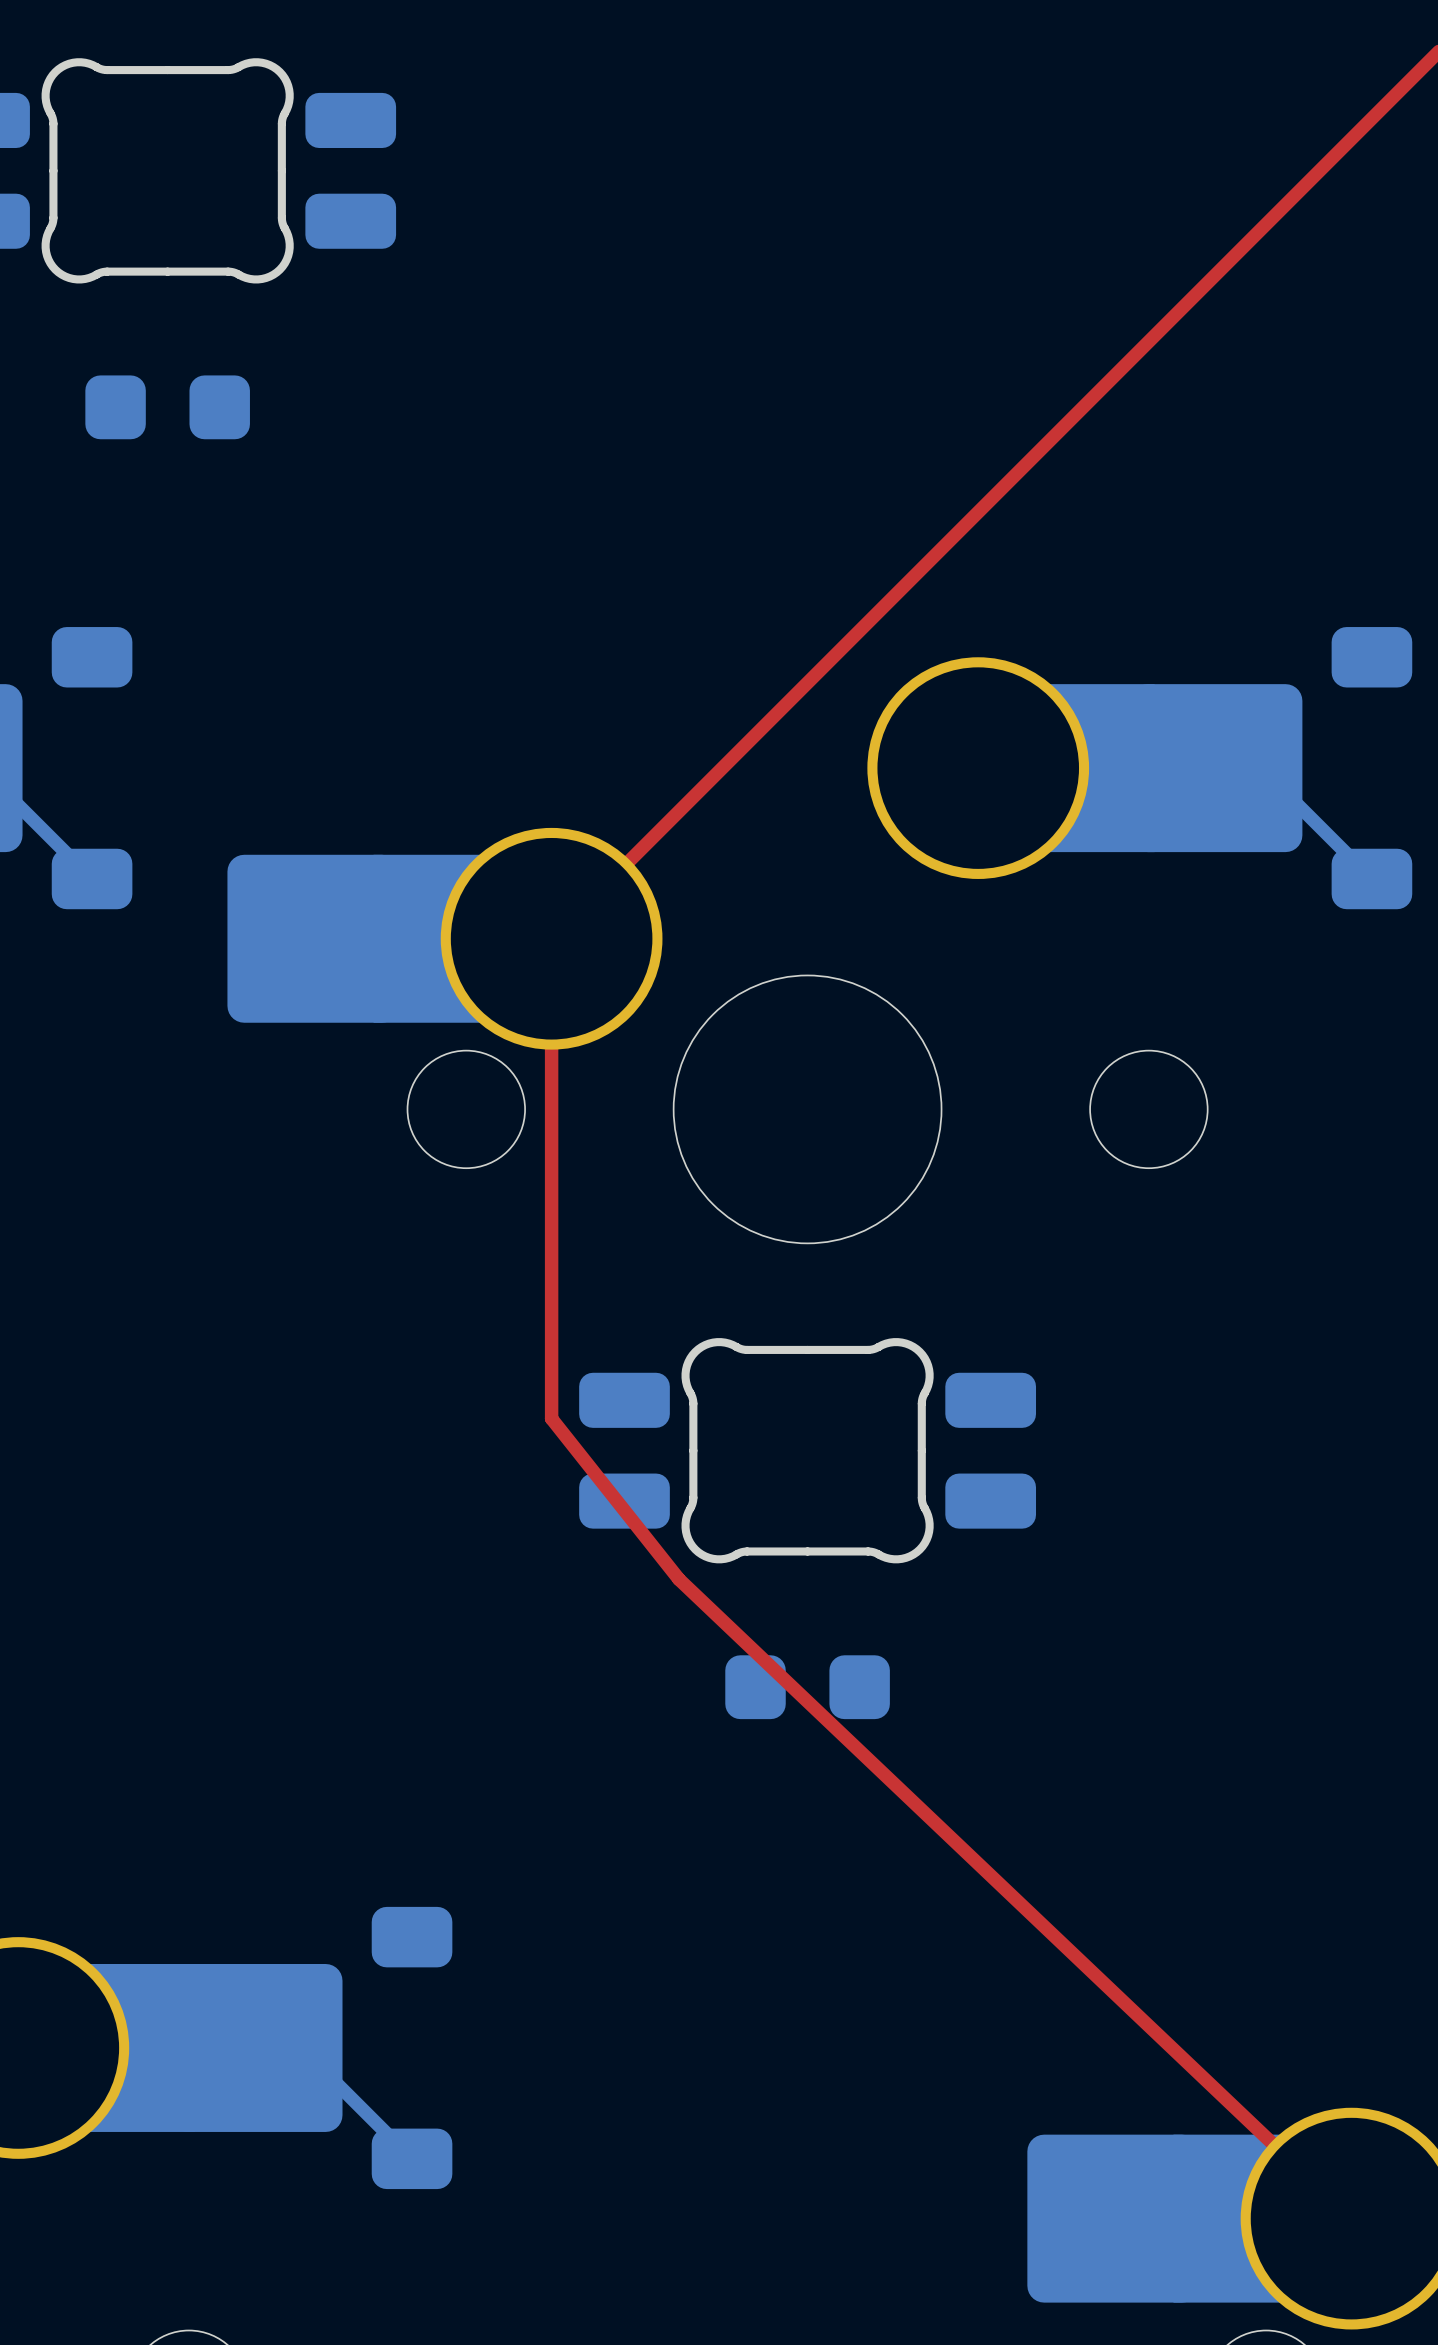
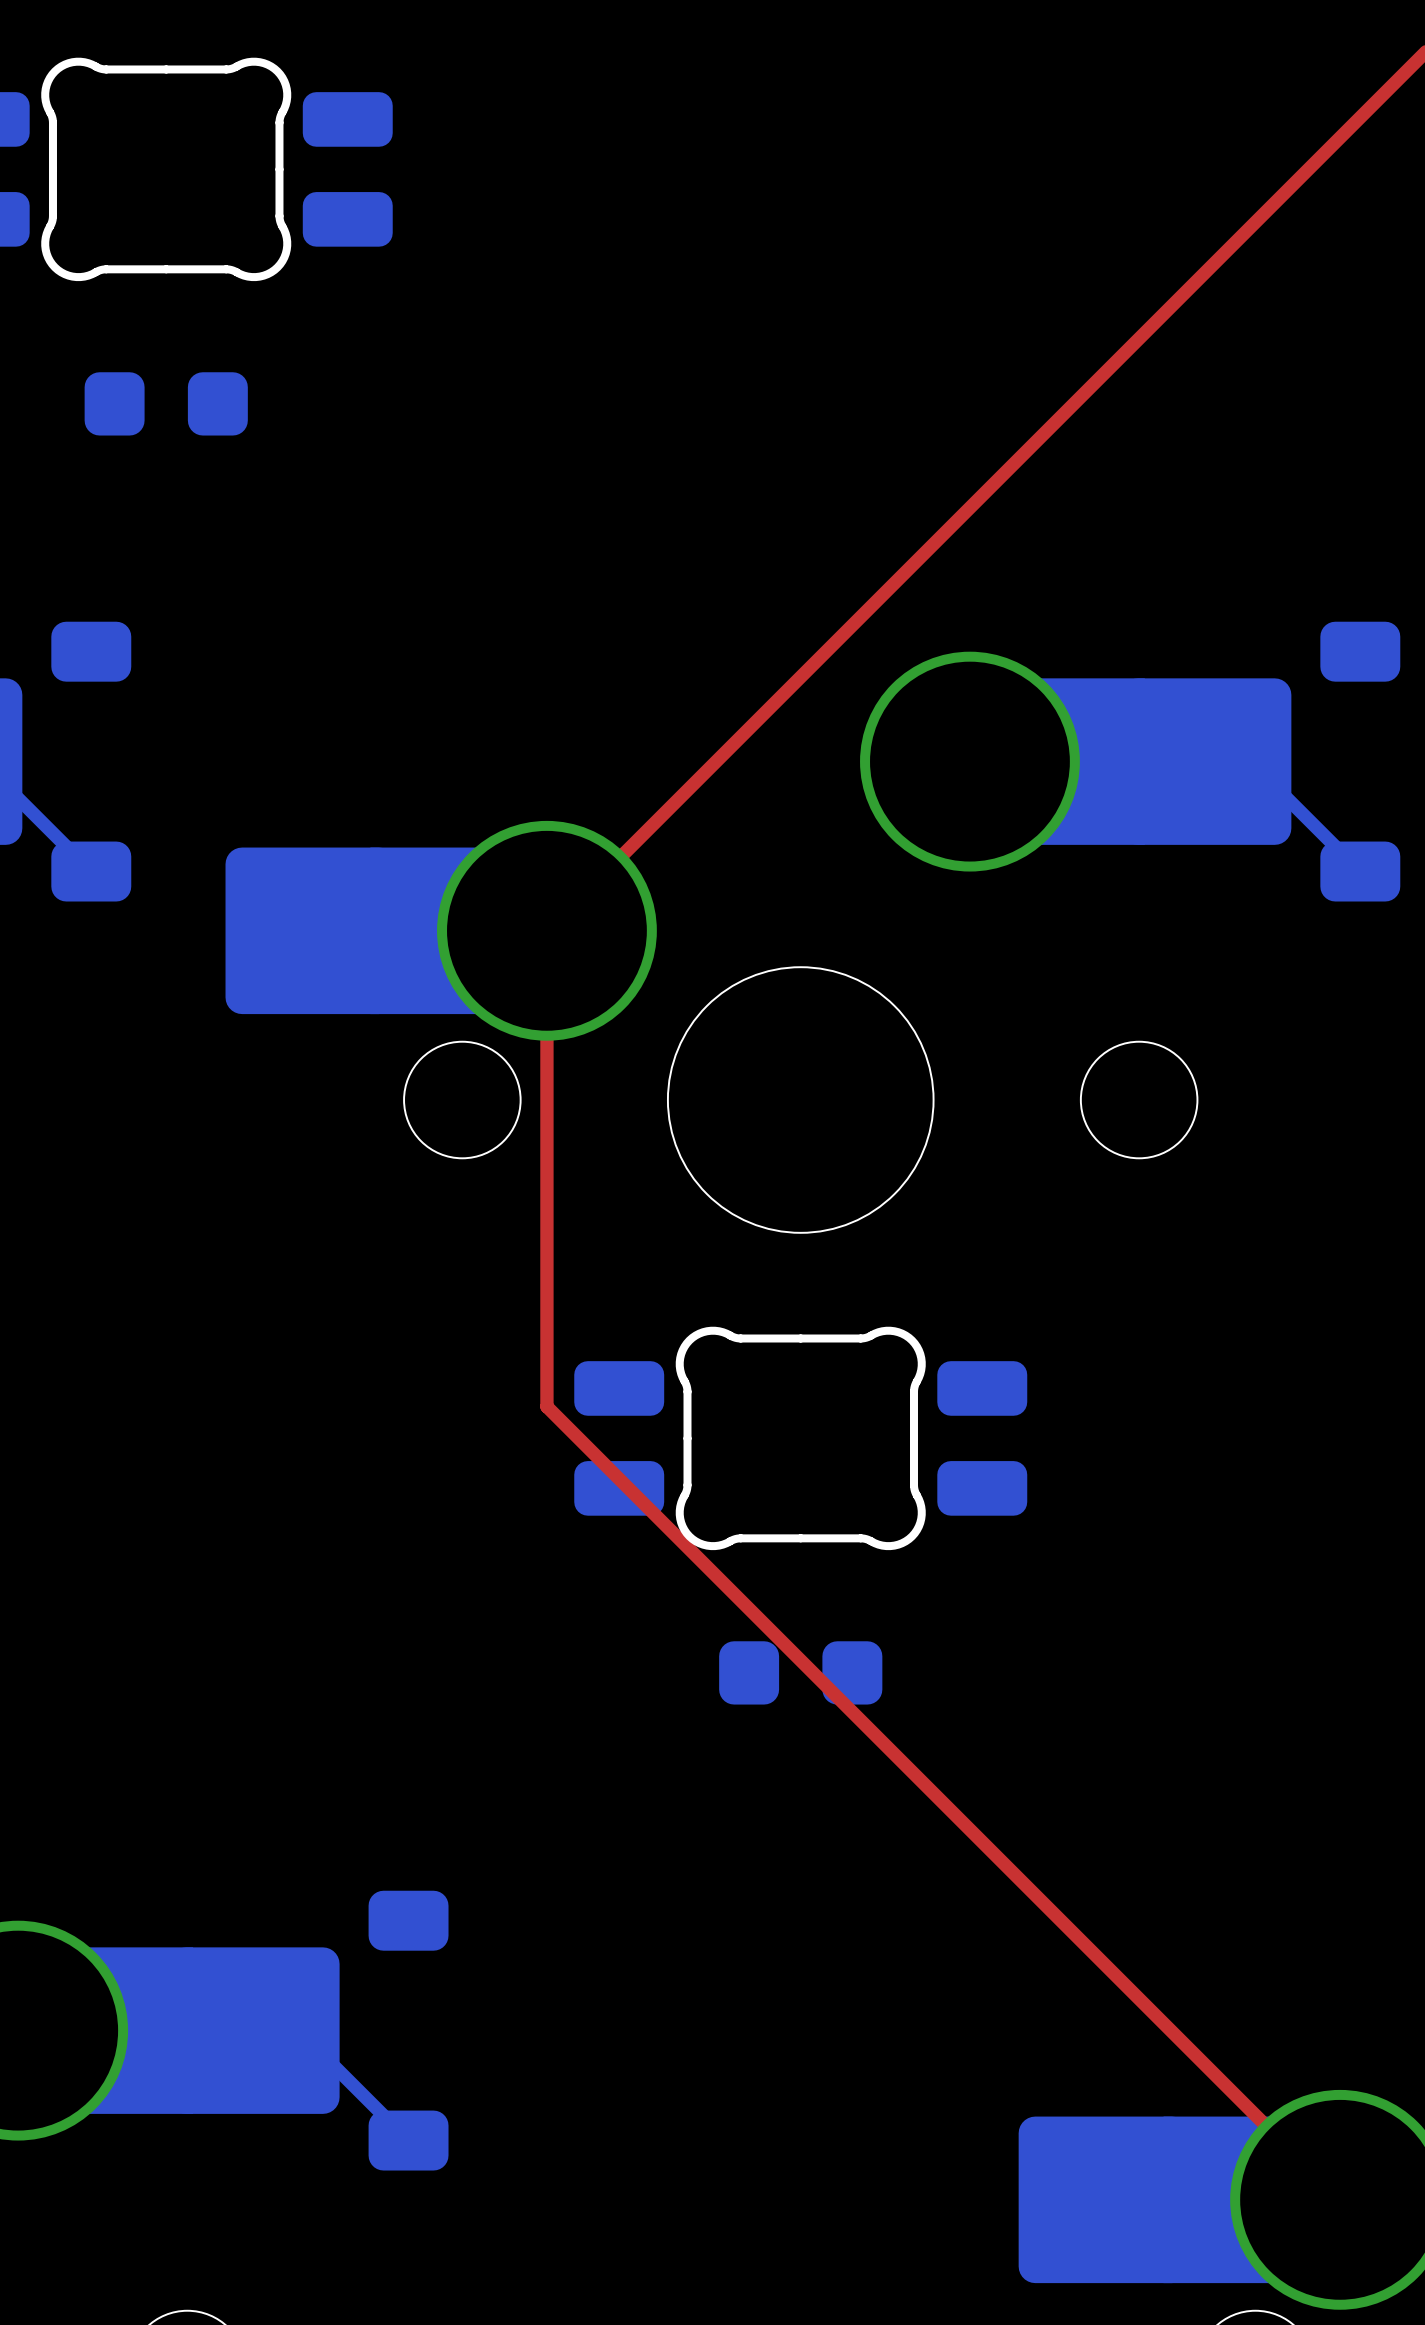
top track: (551, 1418) (678, 1579) (1351, 2218) -> (546, 1406) (1340, 2199)

